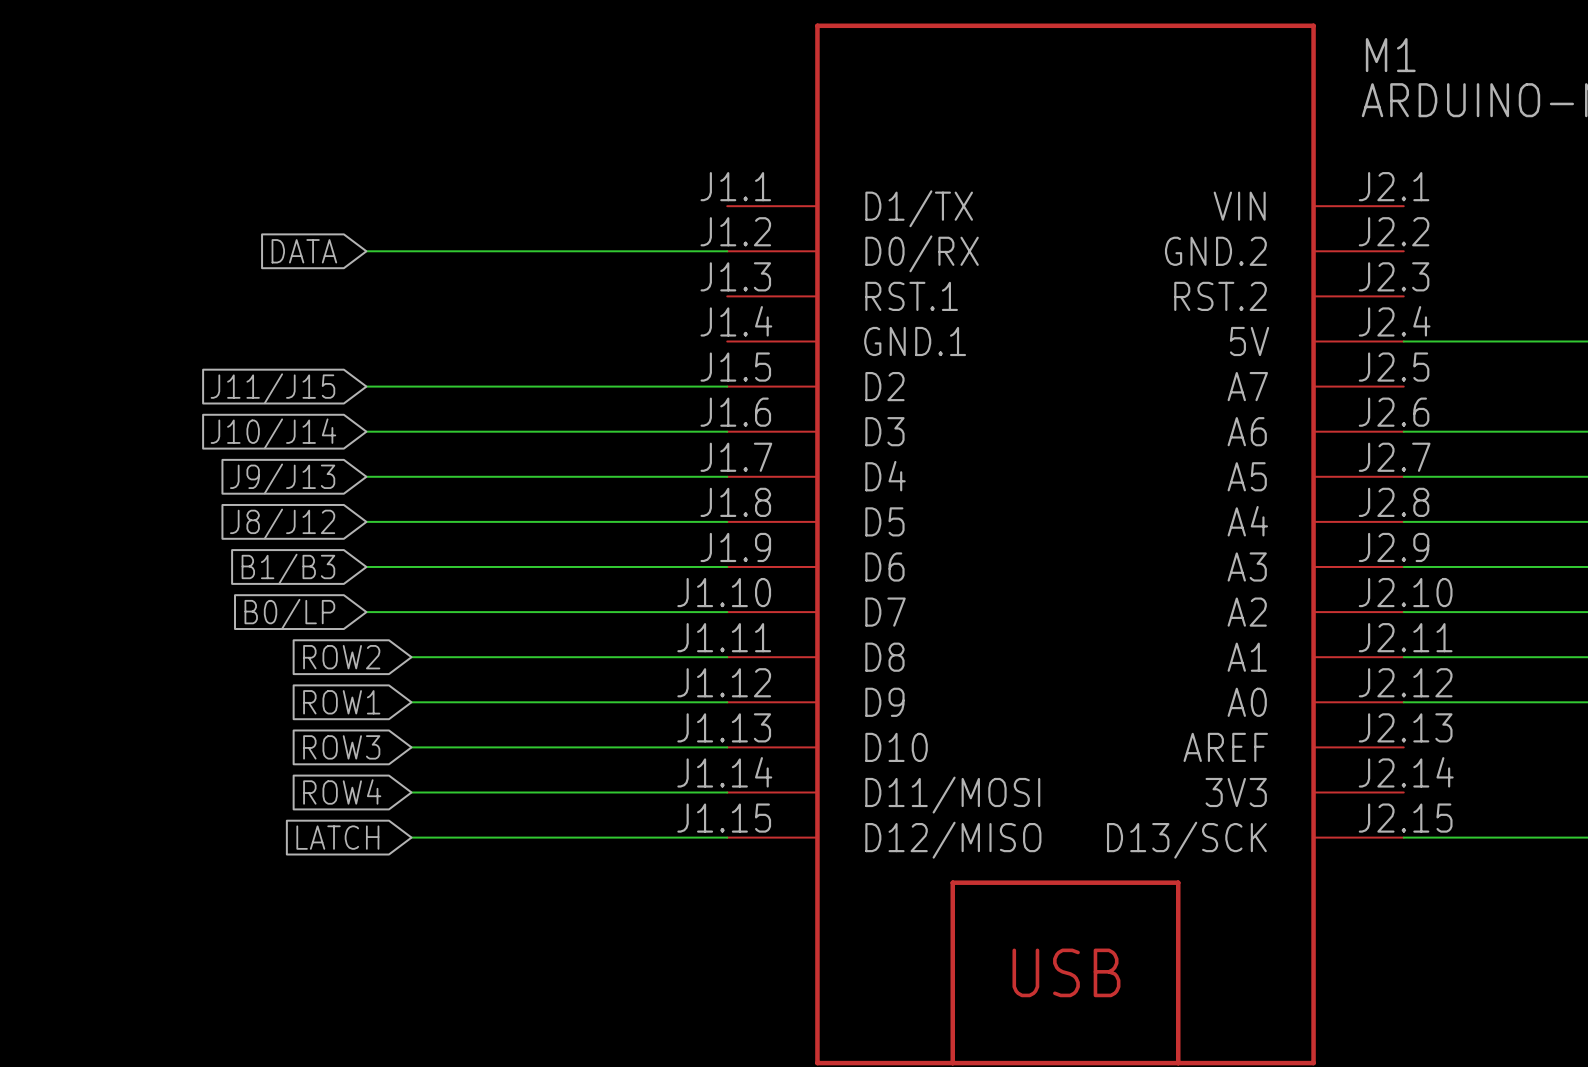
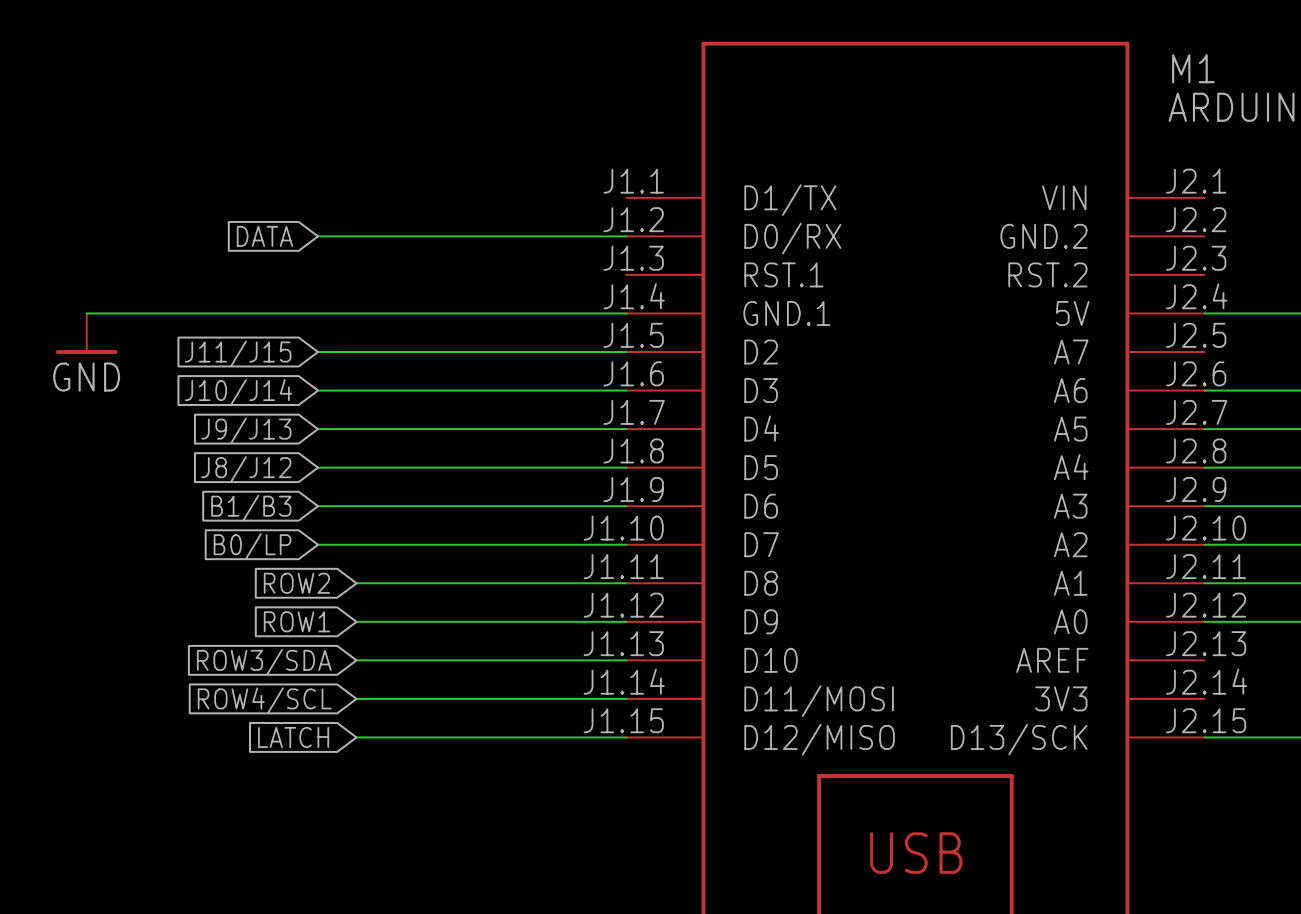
wire: none -> (86, 313) (626, 313)
power symbol: none -> GND (86, 333)
global label: ROW3 (341, 747) -> ROW3/SDA (264, 662)
global label: ROW4 (342, 791) -> ROW4/SCL (264, 700)

